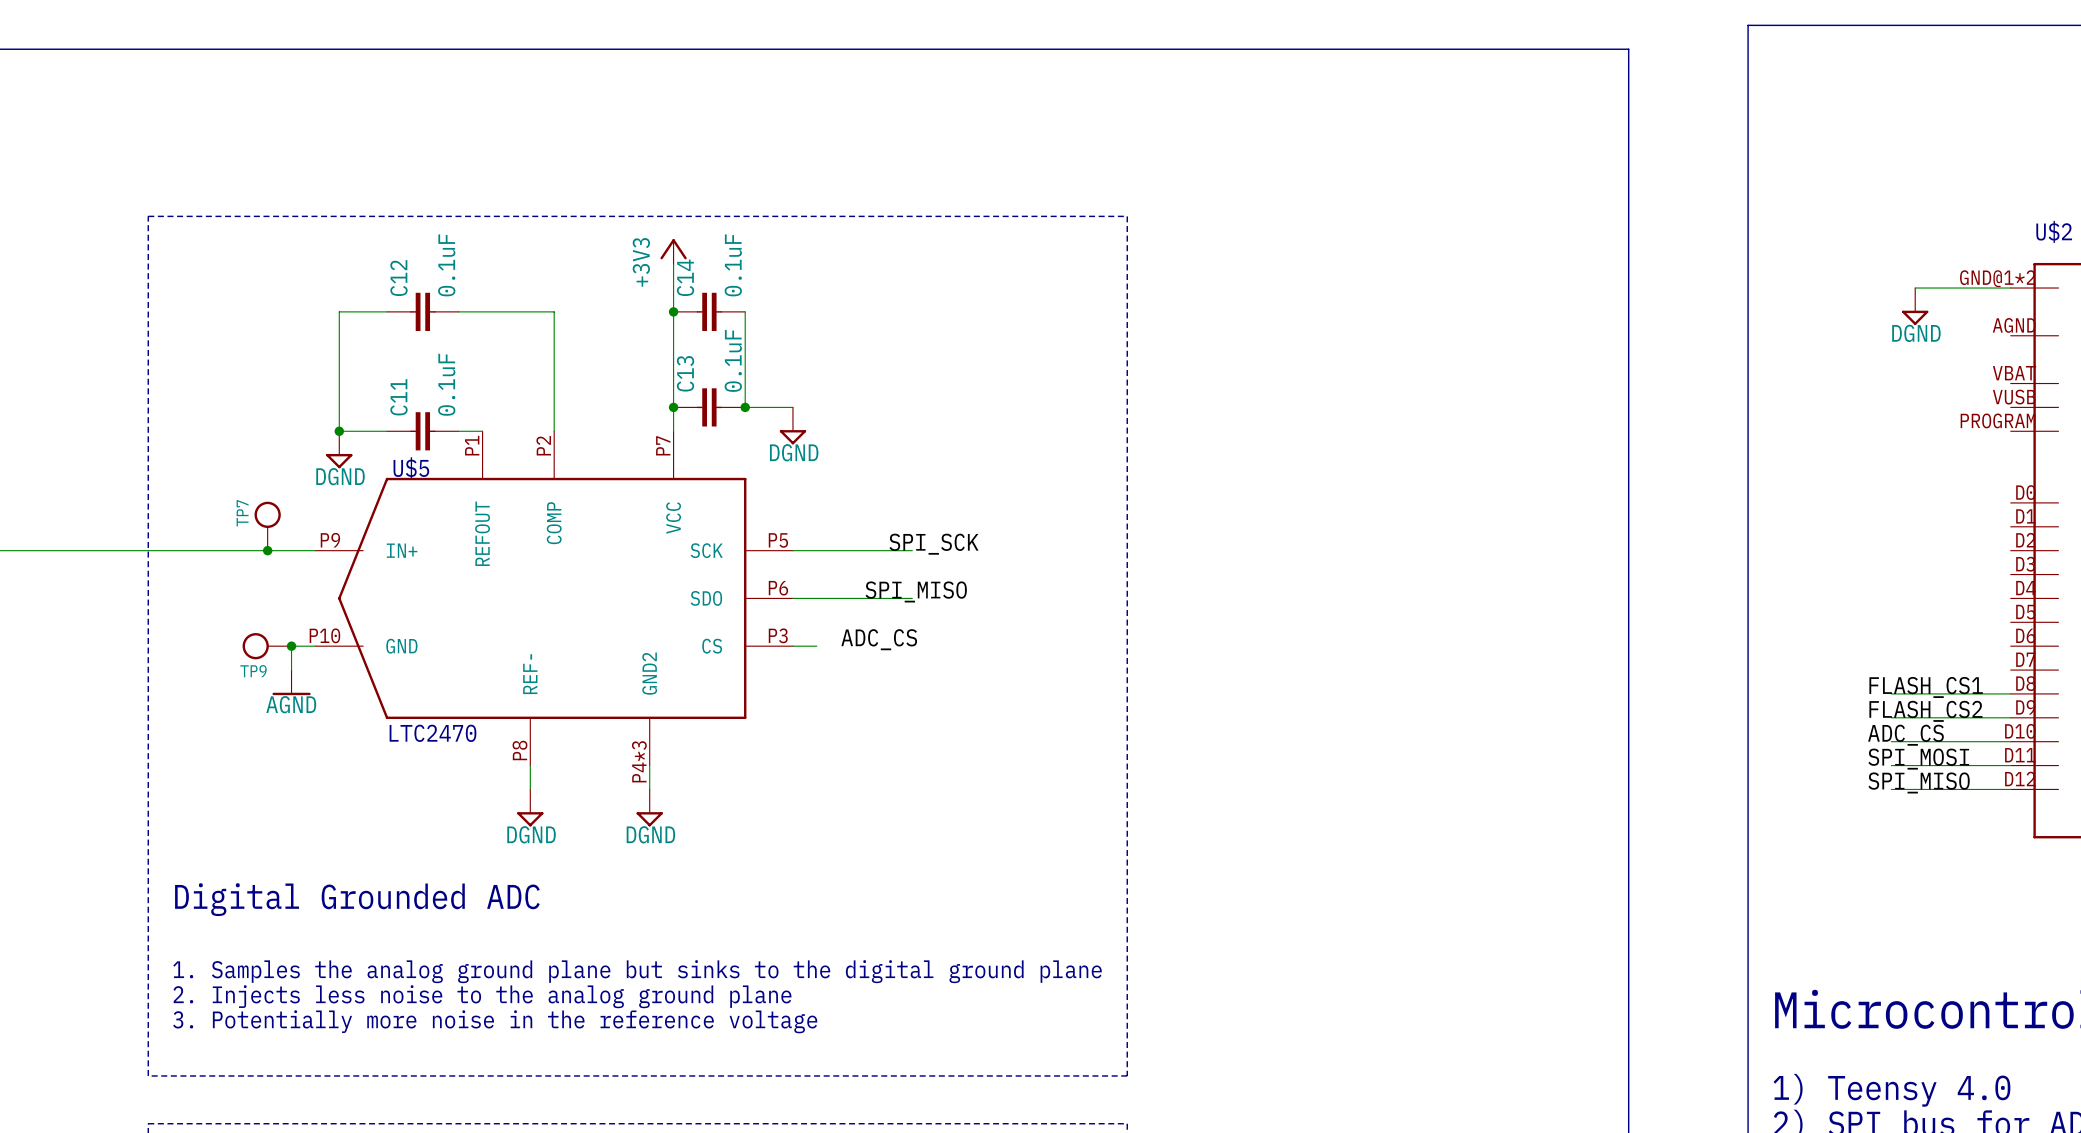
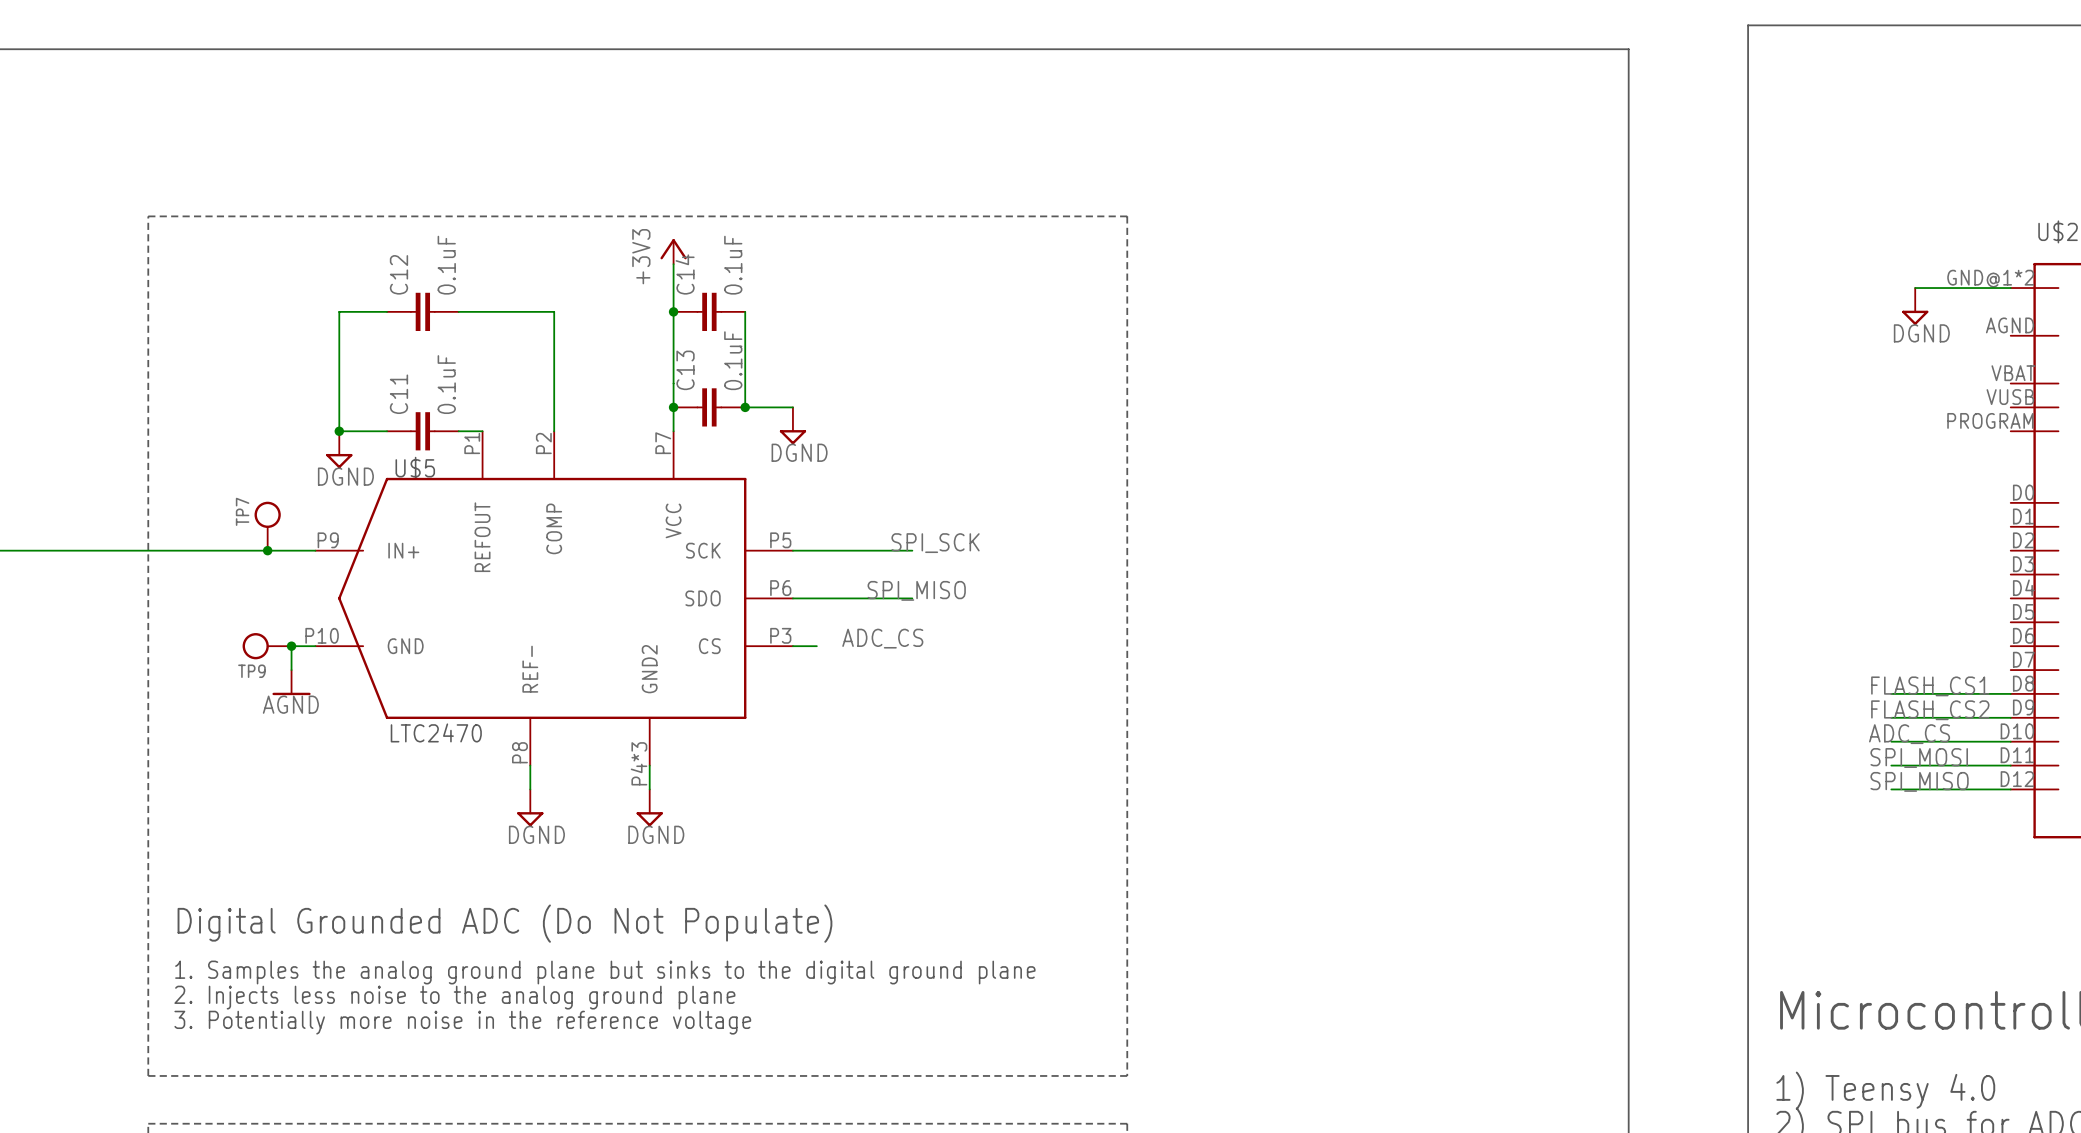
text: Digital Grounded ADC (357, 899) -> Digital Grounded ADC (Do Not Populate) (504, 923)

